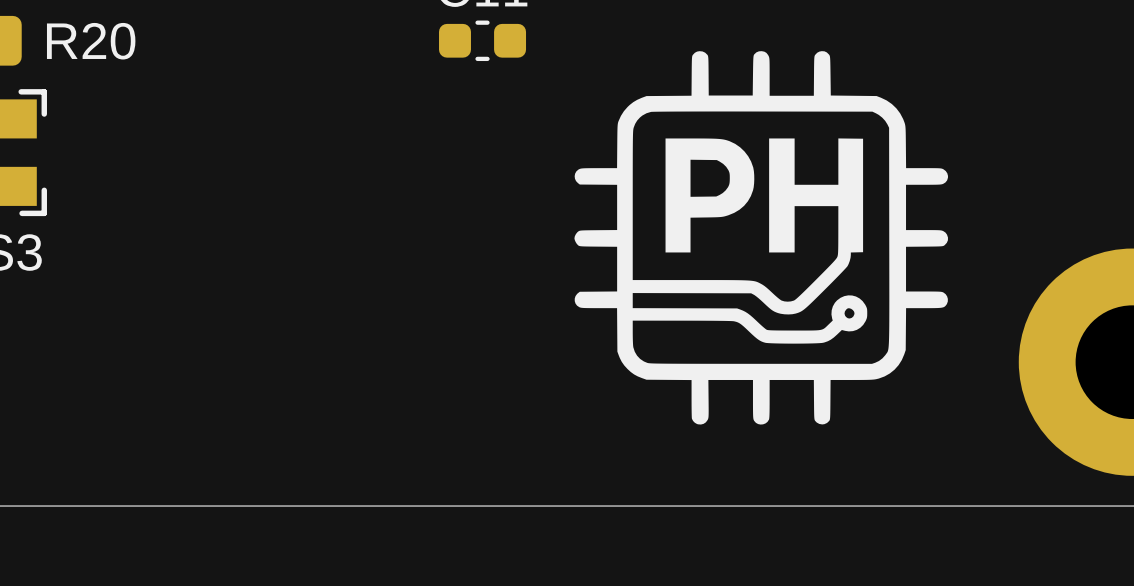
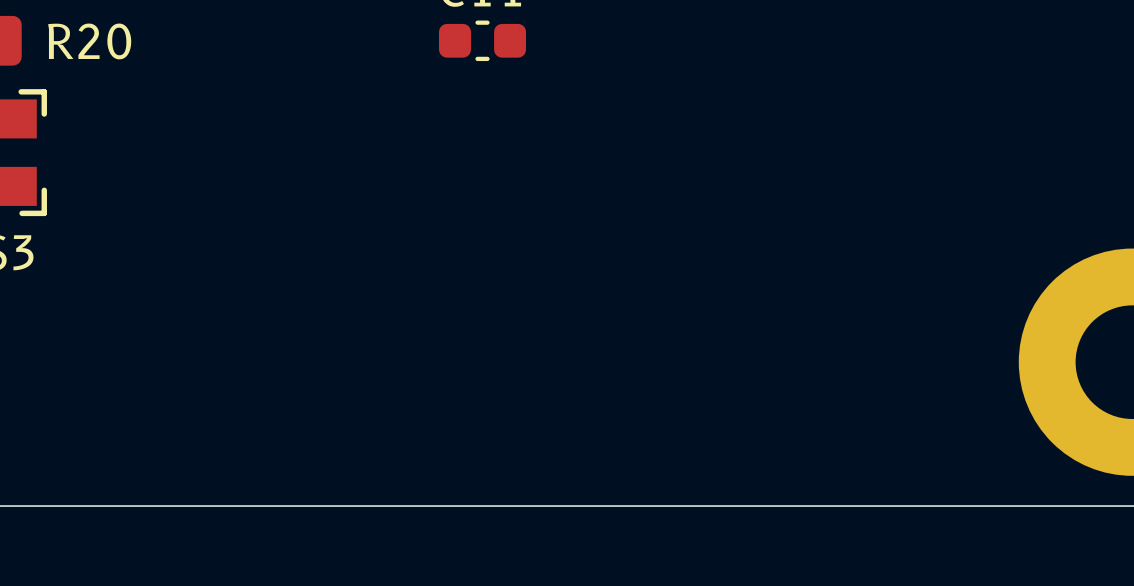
drawing: [574, 51, 949, 425] -> none

